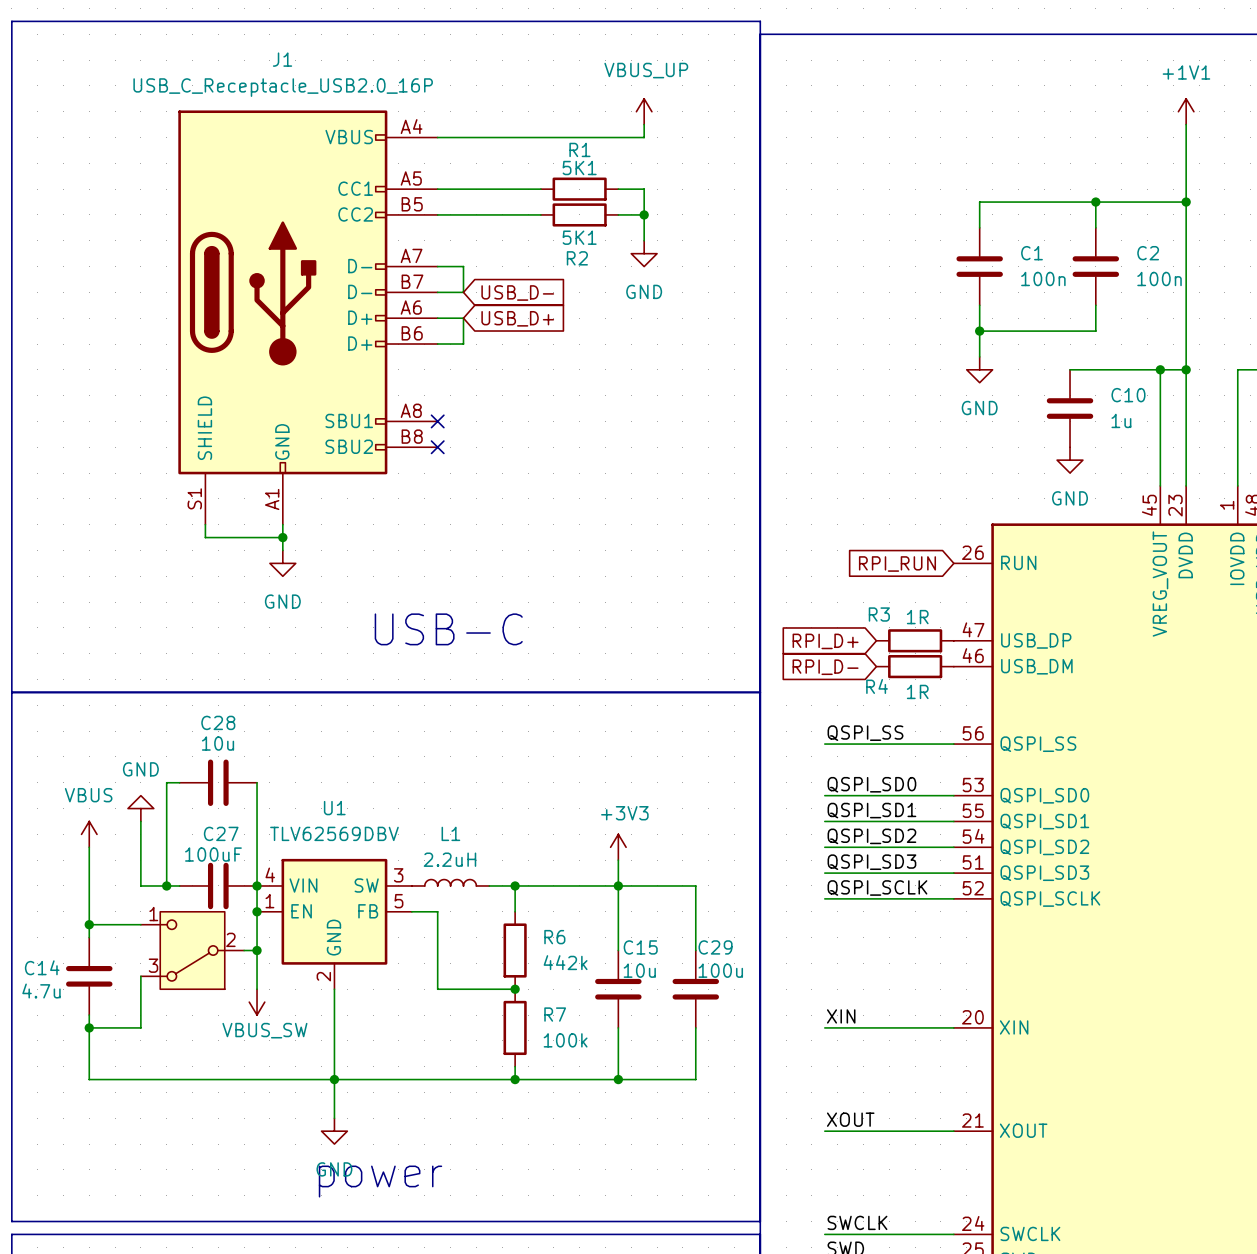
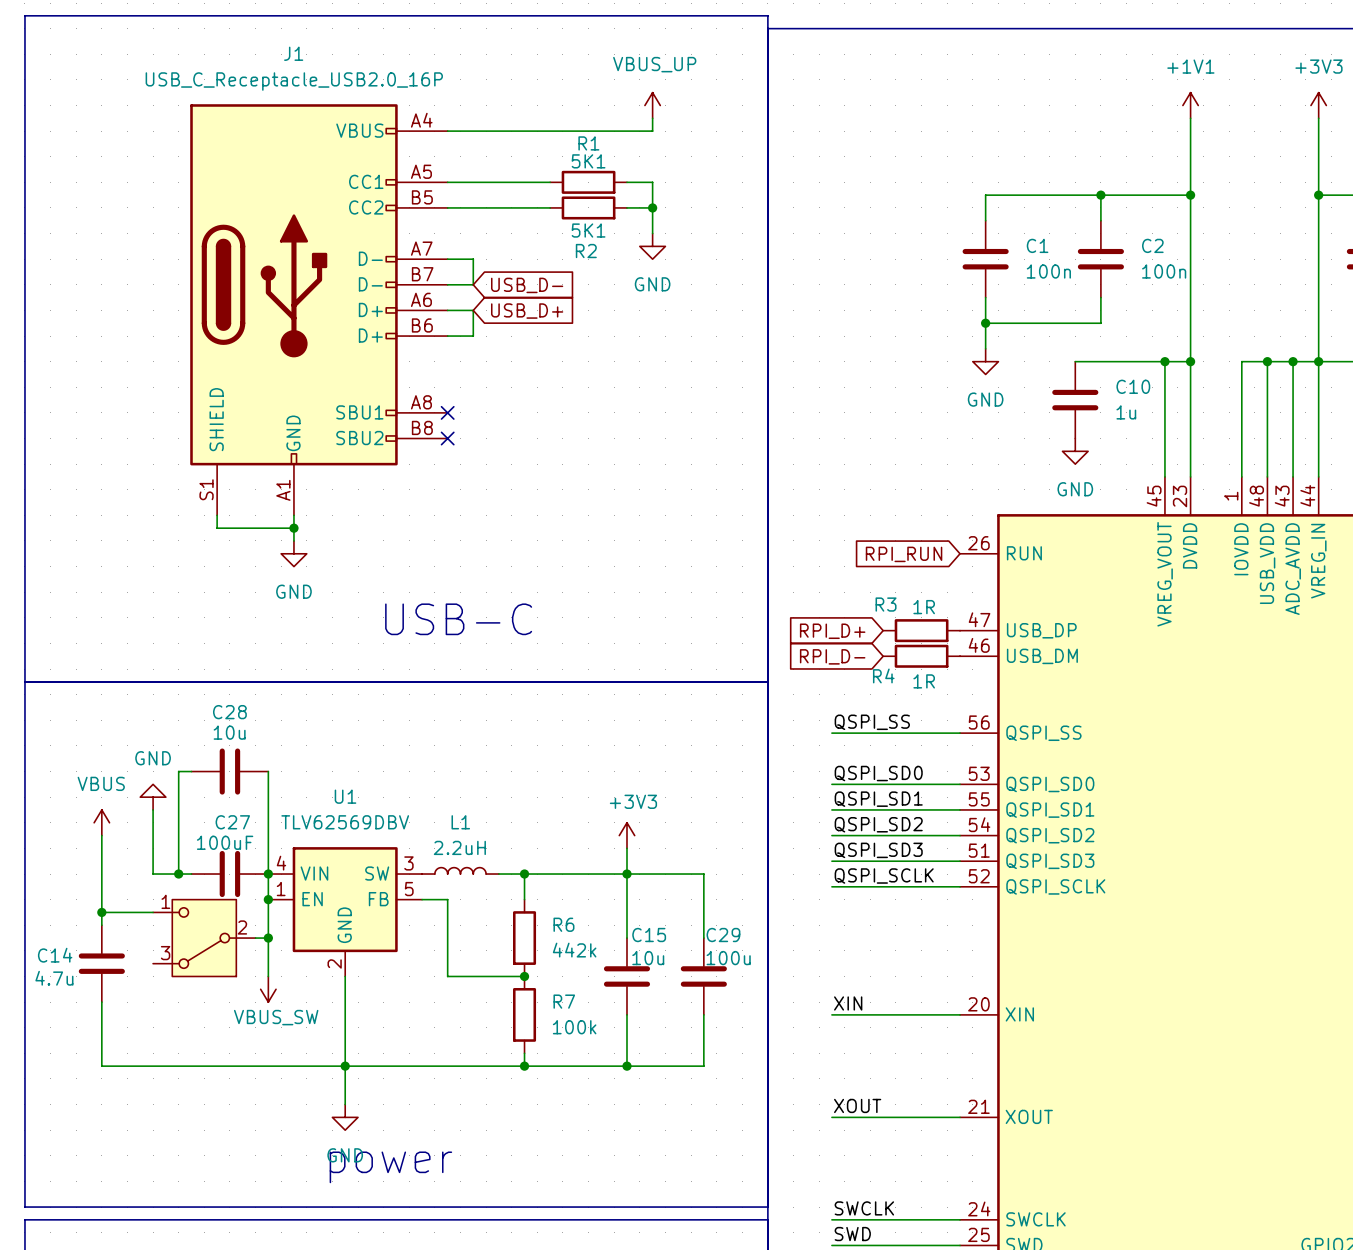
wire: (140, 976) (140, 1027) (89, 1027) -> none
junction: (89, 1027) -> none

